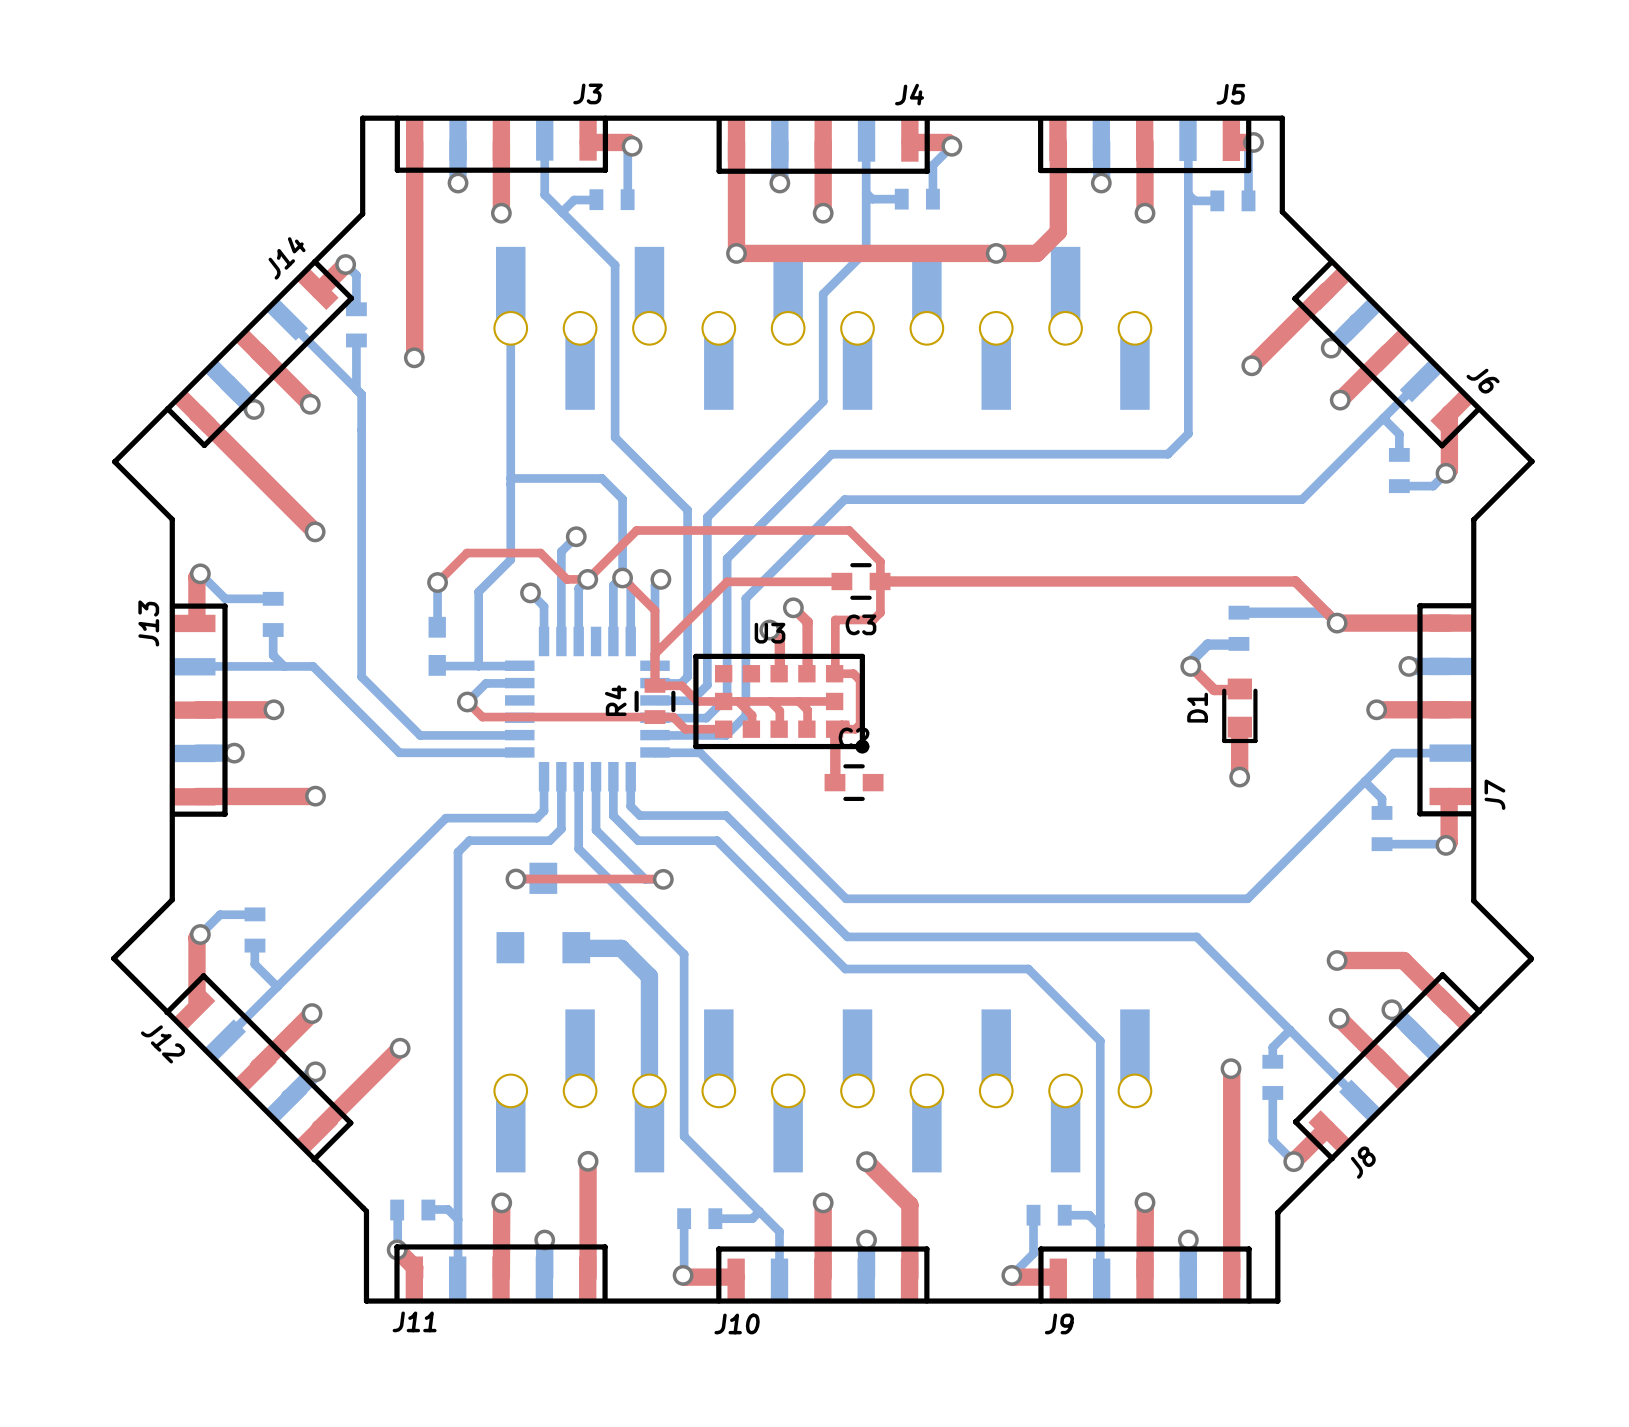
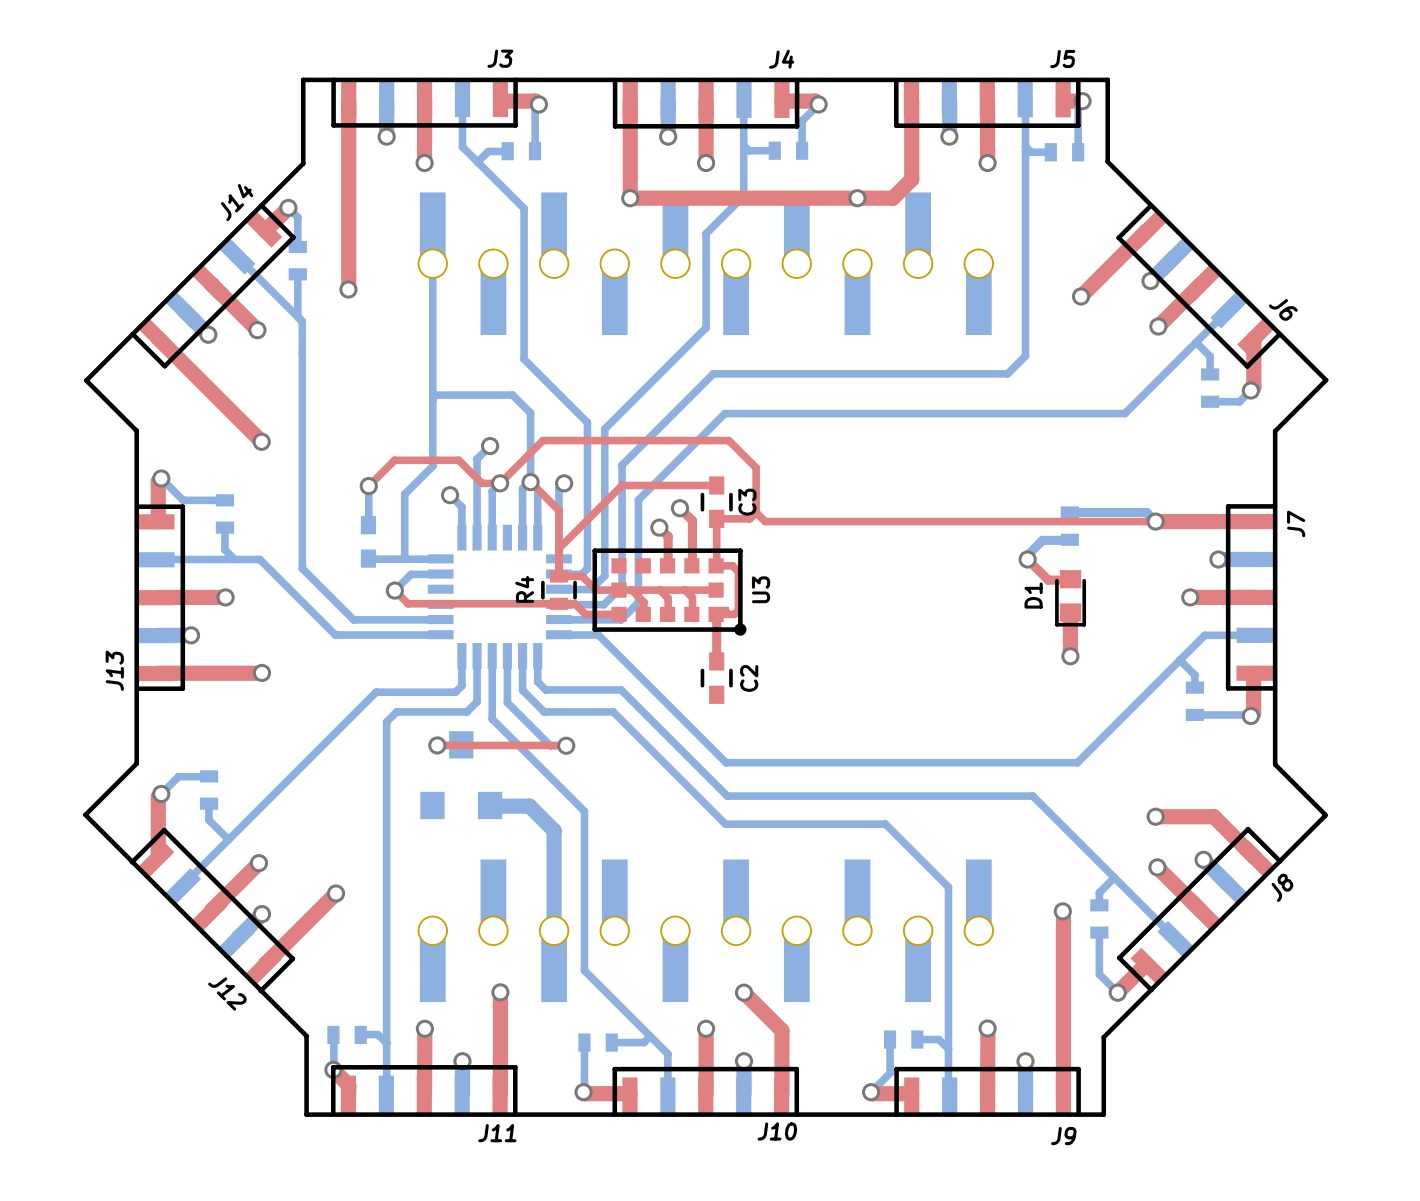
C3 rotation: 0° (860, 581) -> 90° clockwise (716, 502)
top track: (880, 581) (1295, 581) (1337, 623) -> (756, 512) (765, 521) (1155, 521)
J13 name position: J13 (148, 623) -> J13 (114, 670)
U3 name rotation: 0° (770, 633) -> 90° counterclockwise (761, 589)
U3 name position: U3 (770, 633) -> U3 (761, 589)
C2 rotation: 0° (854, 782) -> 90° clockwise (716, 678)
J7 name position: J7 (1494, 794) -> J7 (1296, 523)
J12 name position: J12 (162, 1044) -> J12 (227, 993)
J8 name position: J8 (1363, 1162) -> J8 (1282, 887)
J11 name position: J11 (414, 1321) -> J11 (497, 1133)
J10 name position: J10 (737, 1323) -> J10 (777, 1131)
J9 name position: J9 (1059, 1323) -> J9 (1063, 1136)

